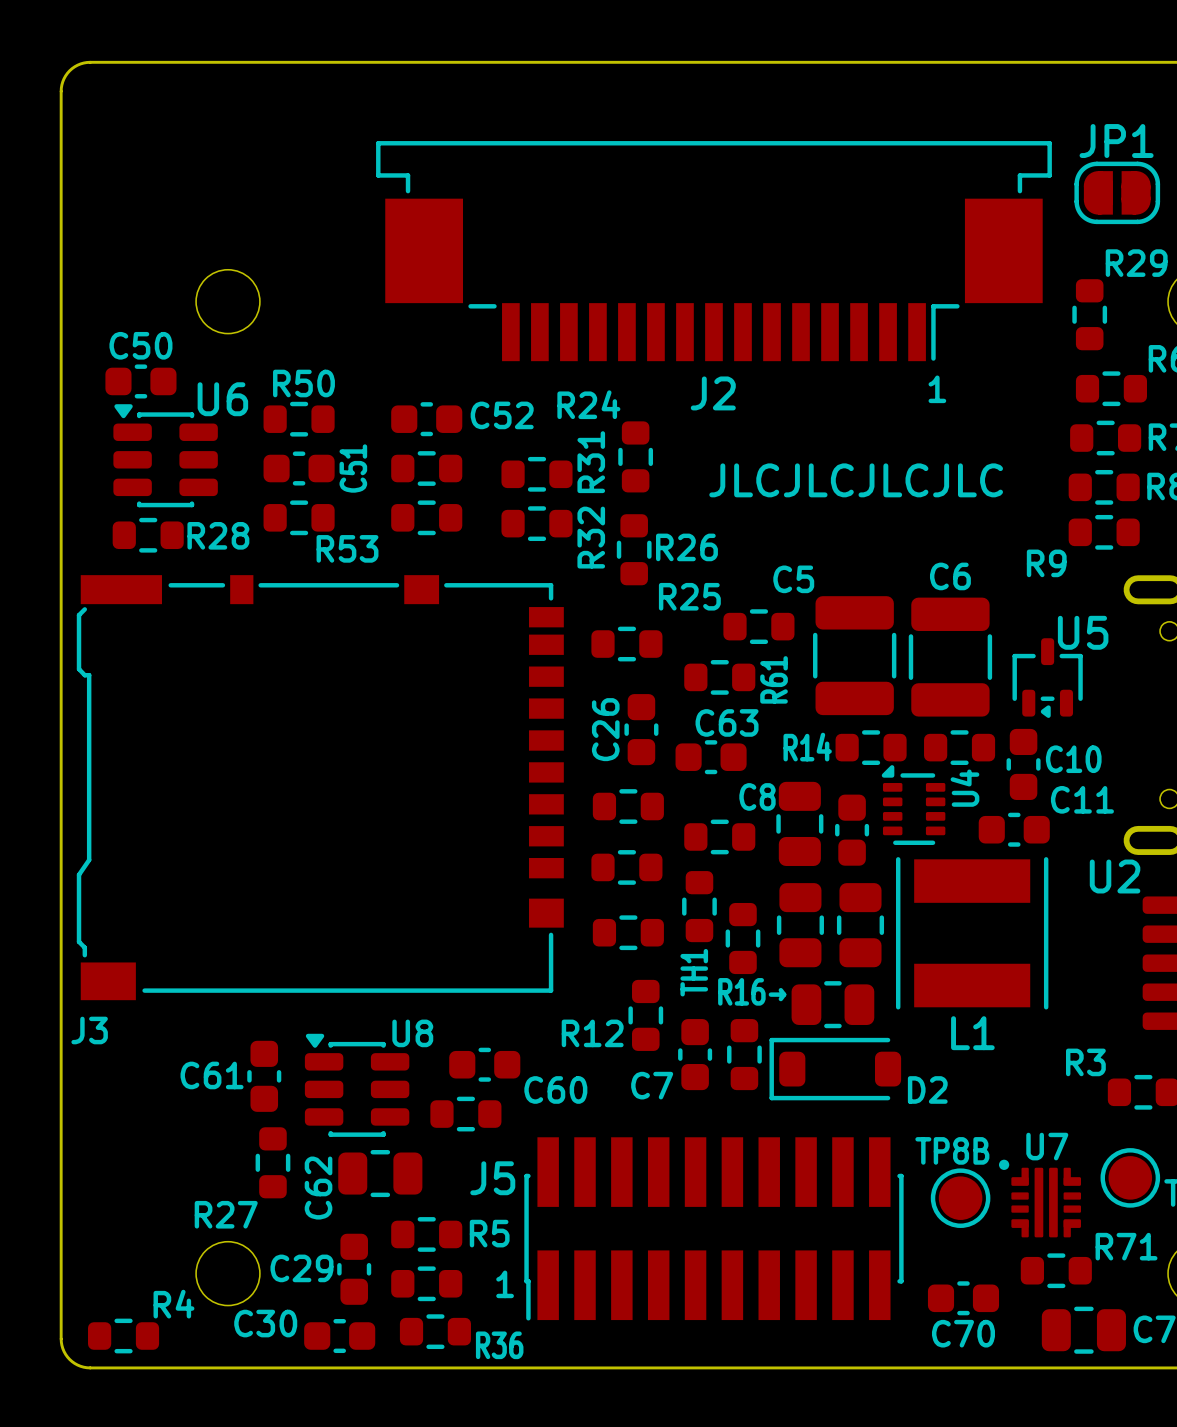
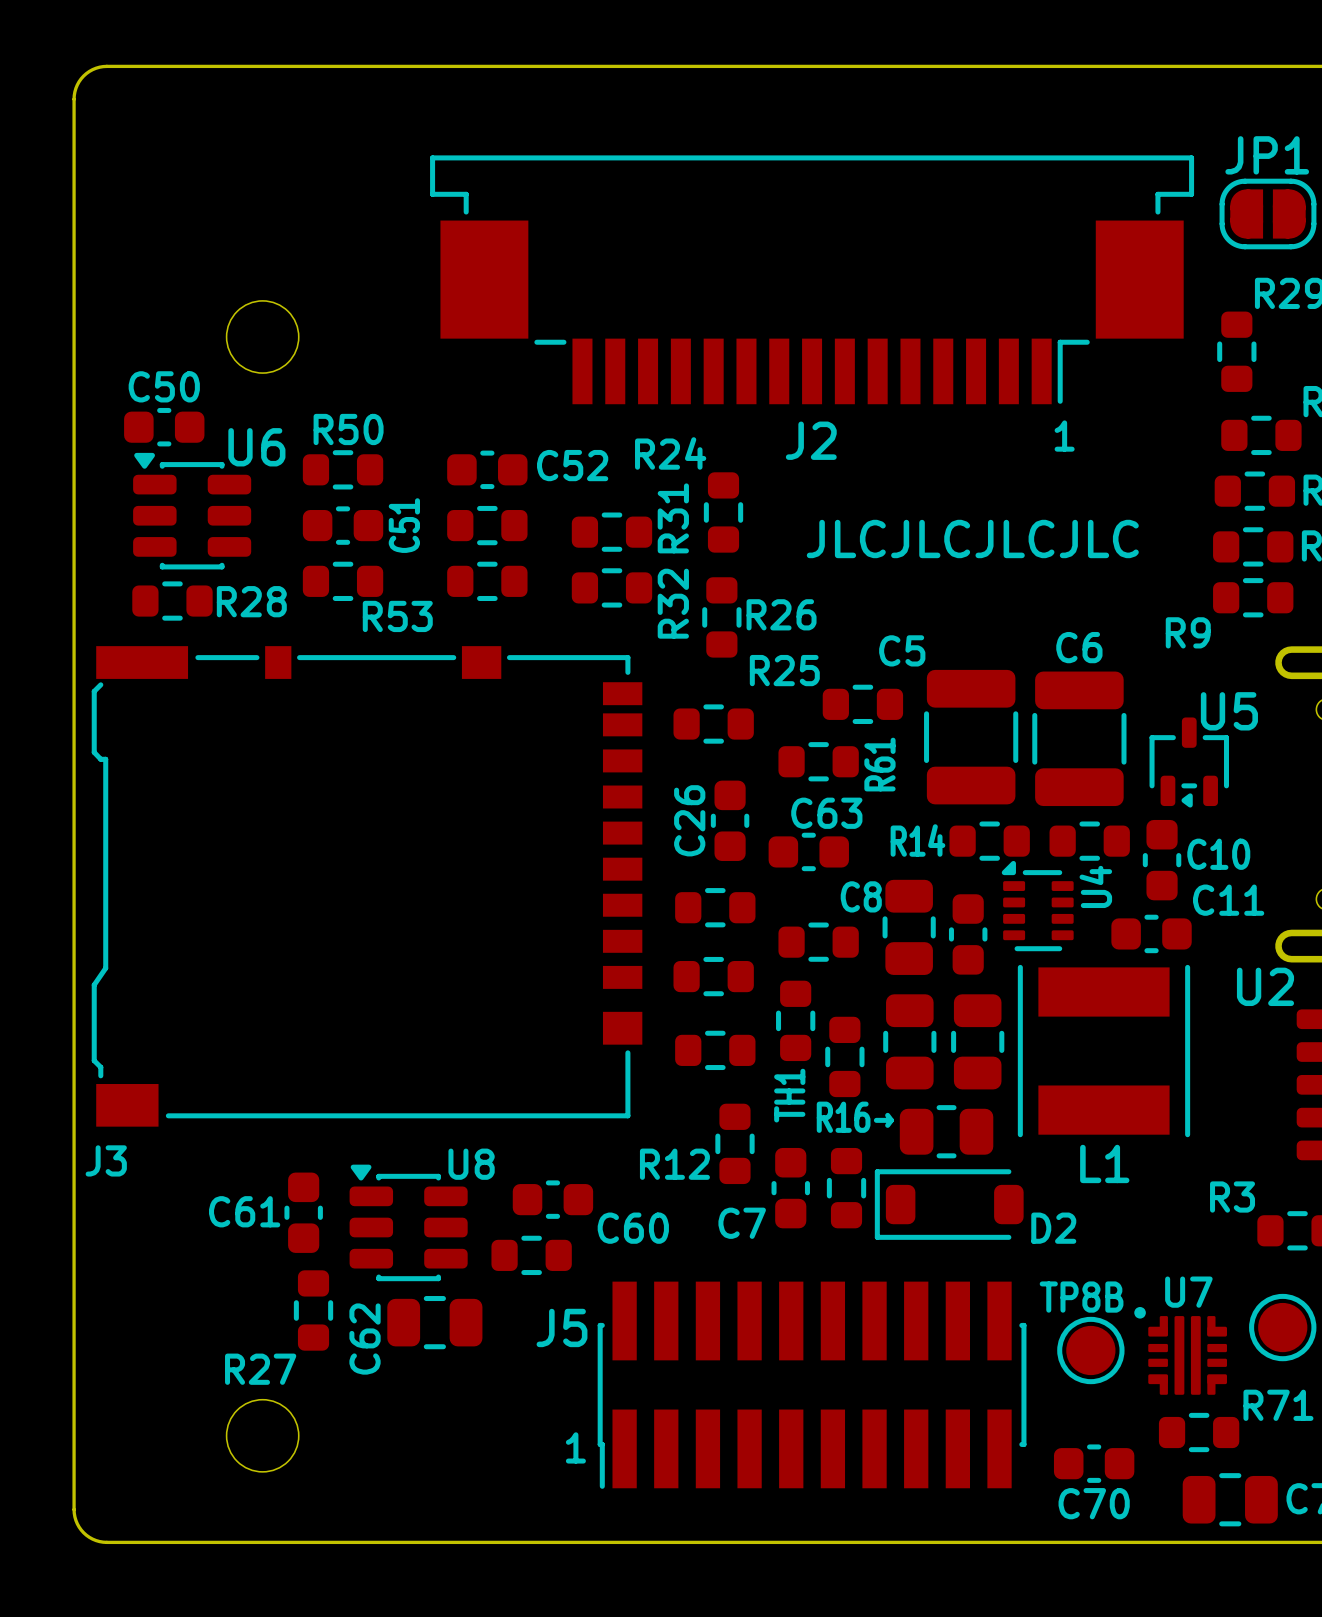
R5: (426, 1234) -> none
C29: (354, 1269) -> none
part: (426, 1283) -> none
R36: (435, 1331) -> none
R4: (123, 1336) -> none
C30: (339, 1336) -> none

